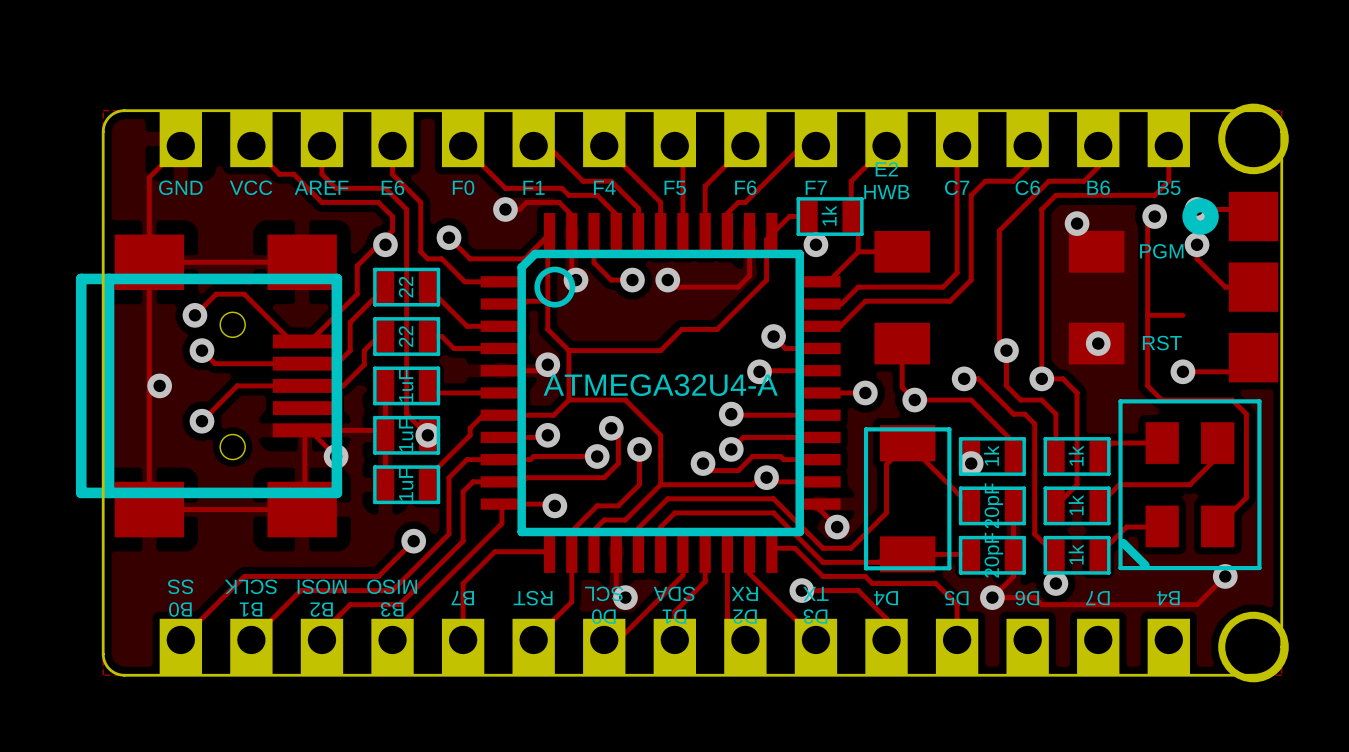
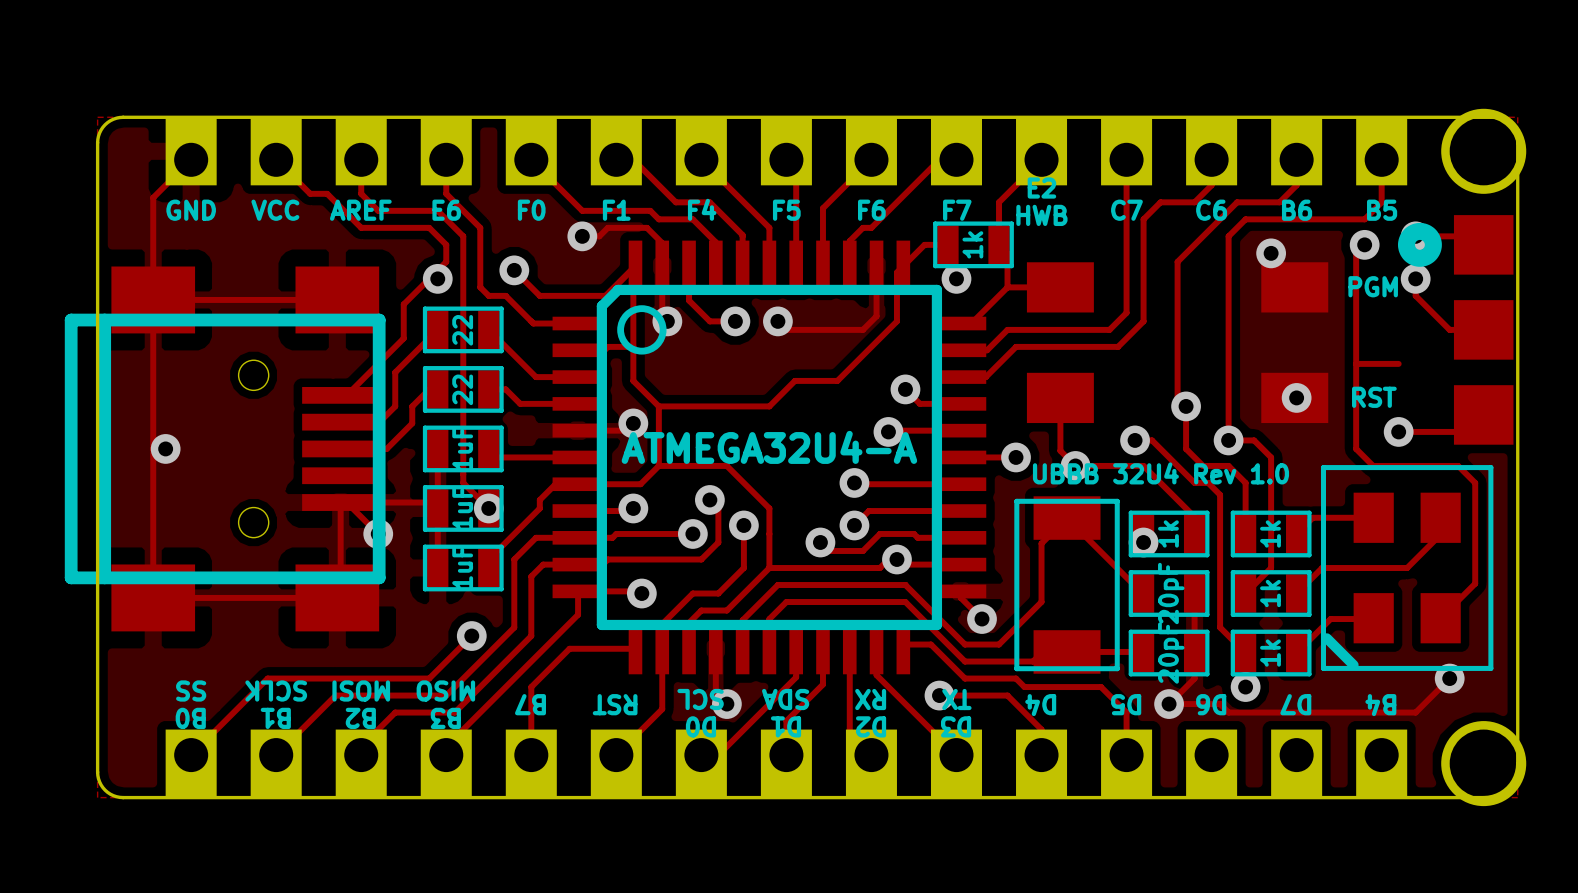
track: (194, 315) (216, 294) (244, 294) (291, 341) (304, 341) -> none
via: (194, 315) -> none
track: (202, 350) (215, 363) (304, 363) -> none
via: (202, 350) -> none
track: (304, 385) (237, 385) (202, 421) -> none
text: none -> UBBB 32U4 Rev 1.0 (1160, 473)
via: (202, 421) -> none

